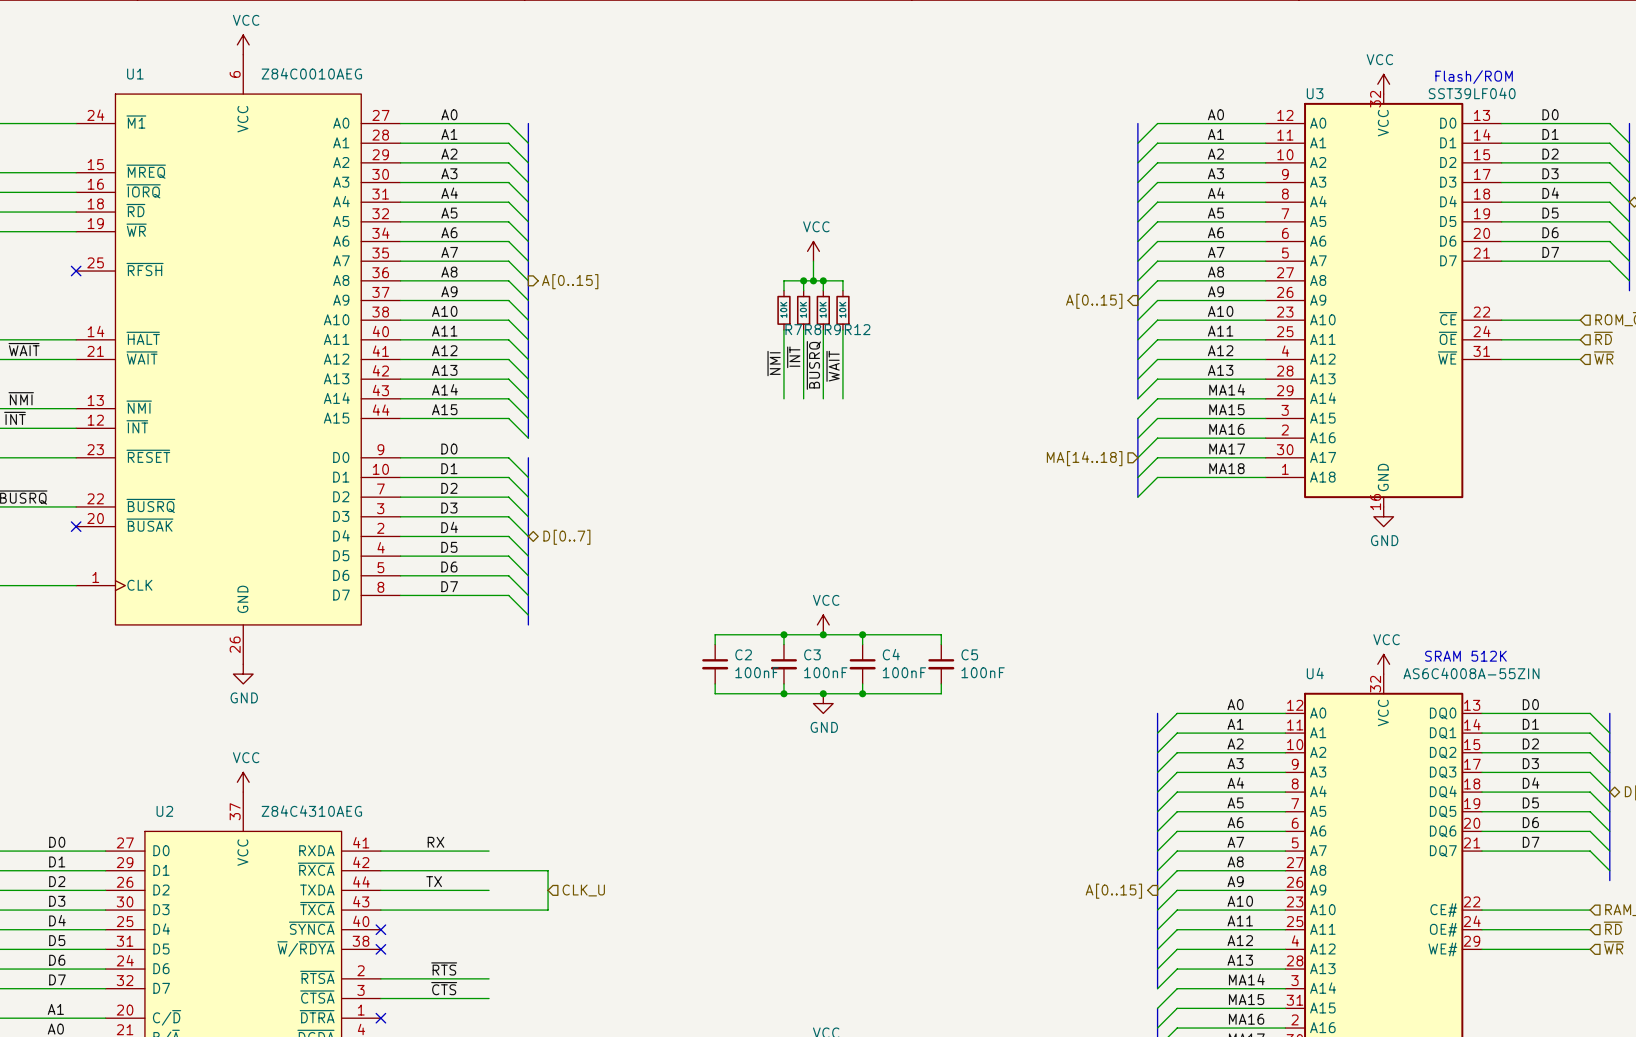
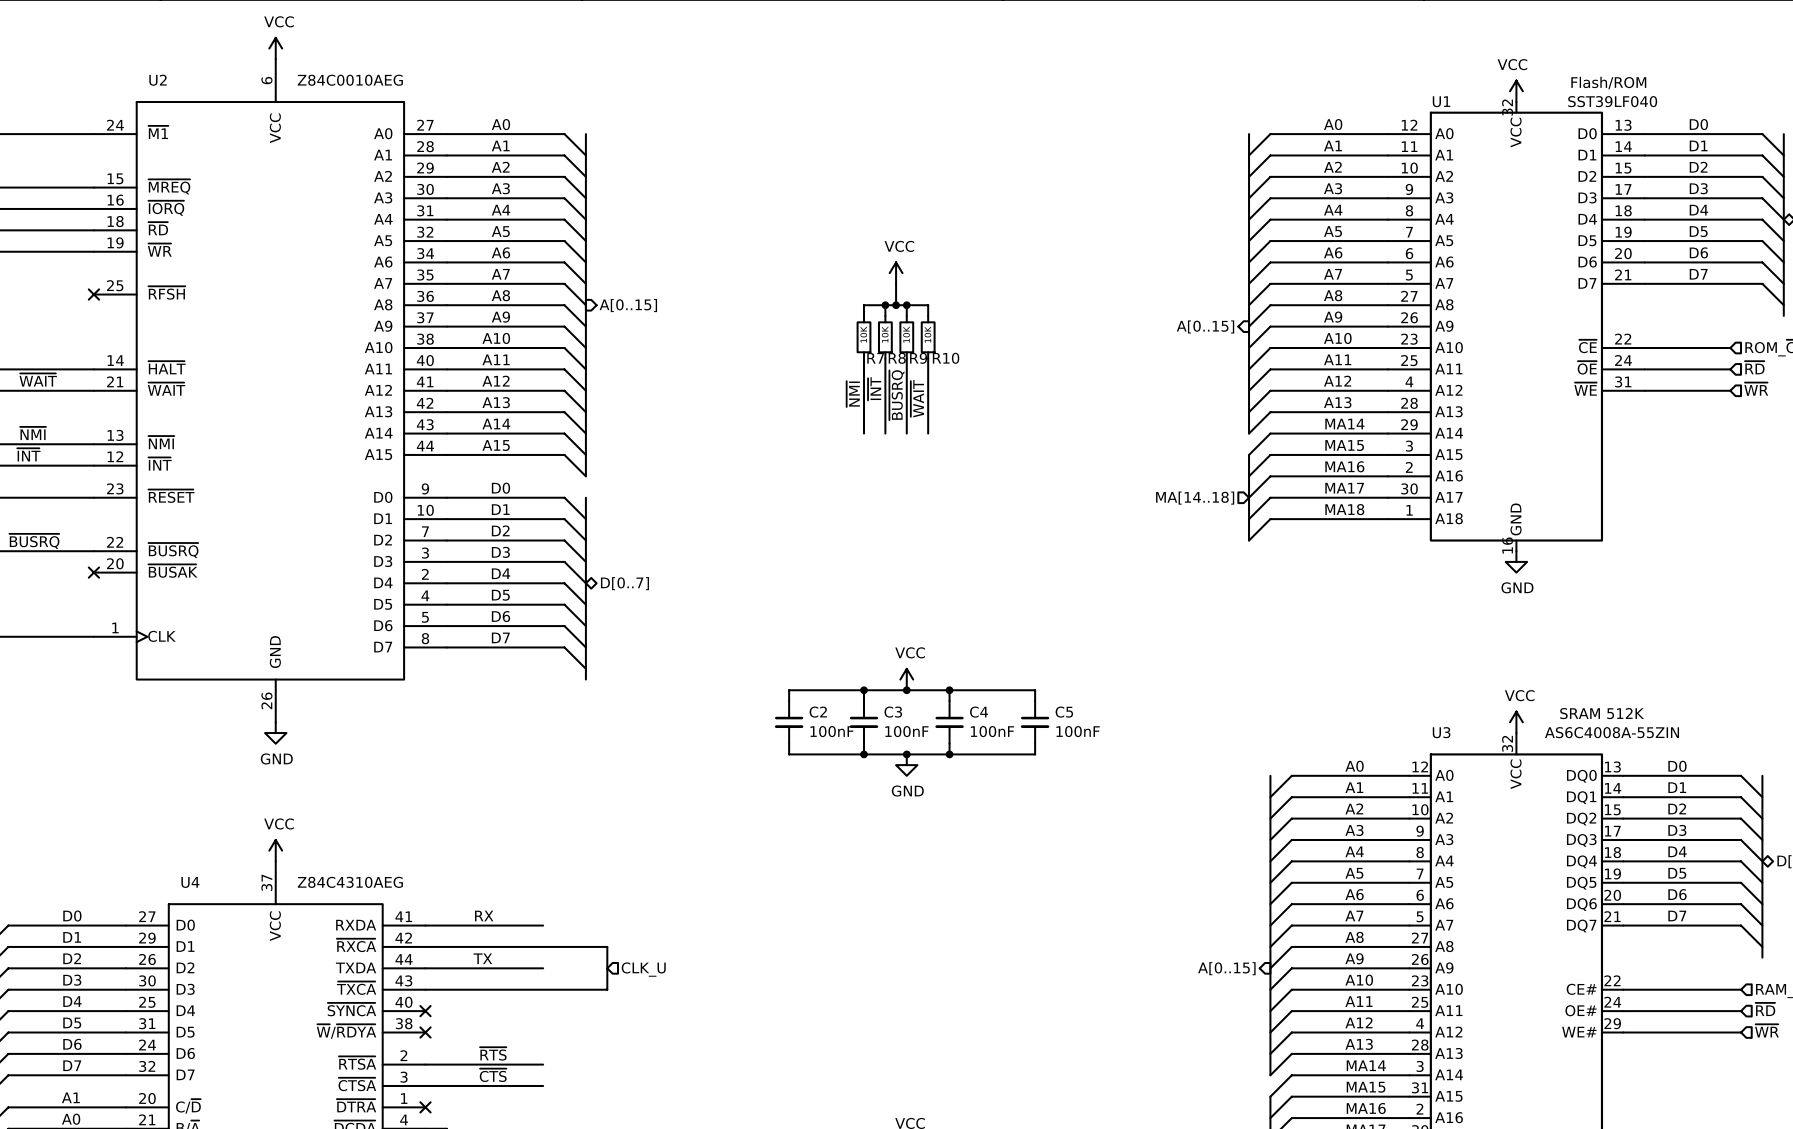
U1 name: U1 (135, 74) -> U2 (158, 80)
U3 name: U3 (1315, 93) -> U1 (1441, 101)
R12 name: R12 (857, 329) -> R10 (946, 358)
U4 name: U4 (1315, 673) -> U3 (1441, 732)
U2 name: U2 (164, 811) -> U4 (190, 882)

